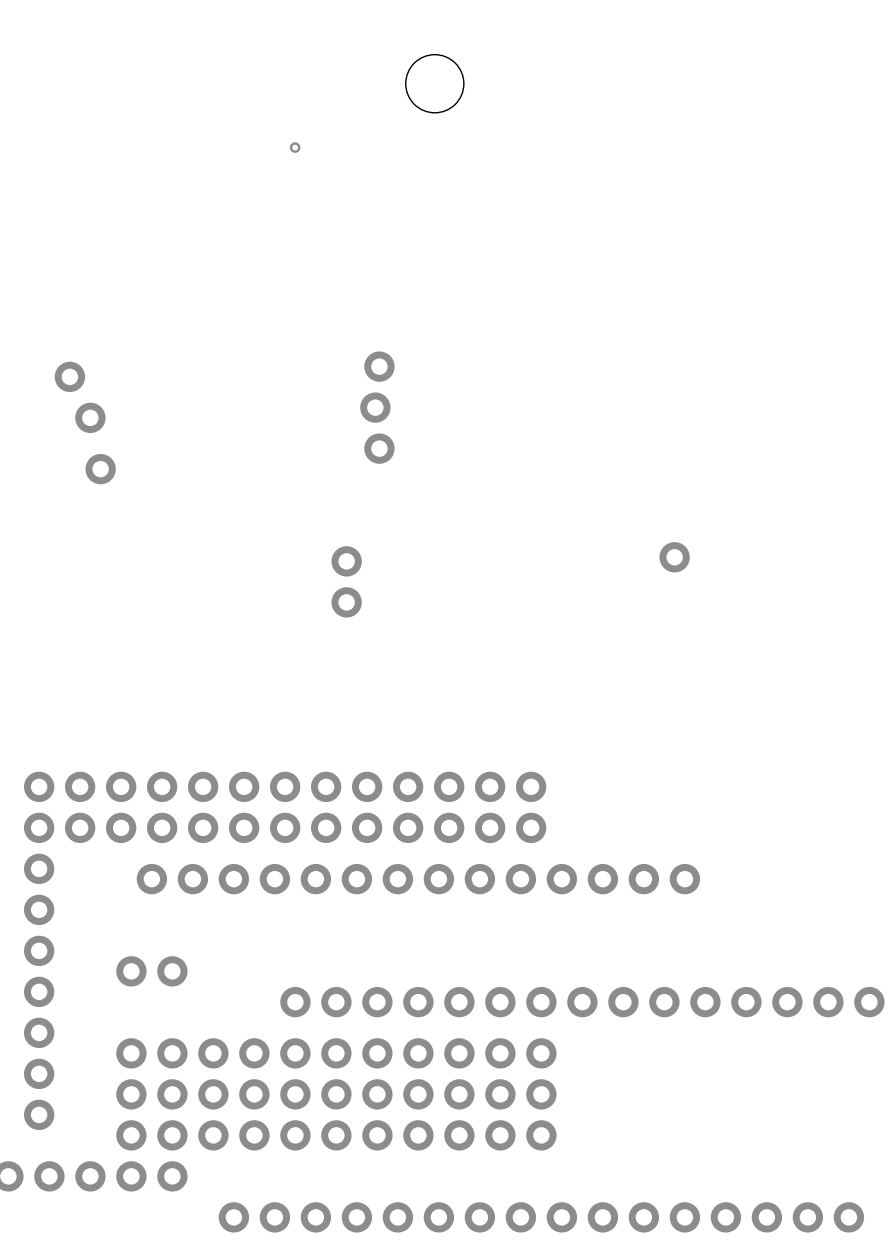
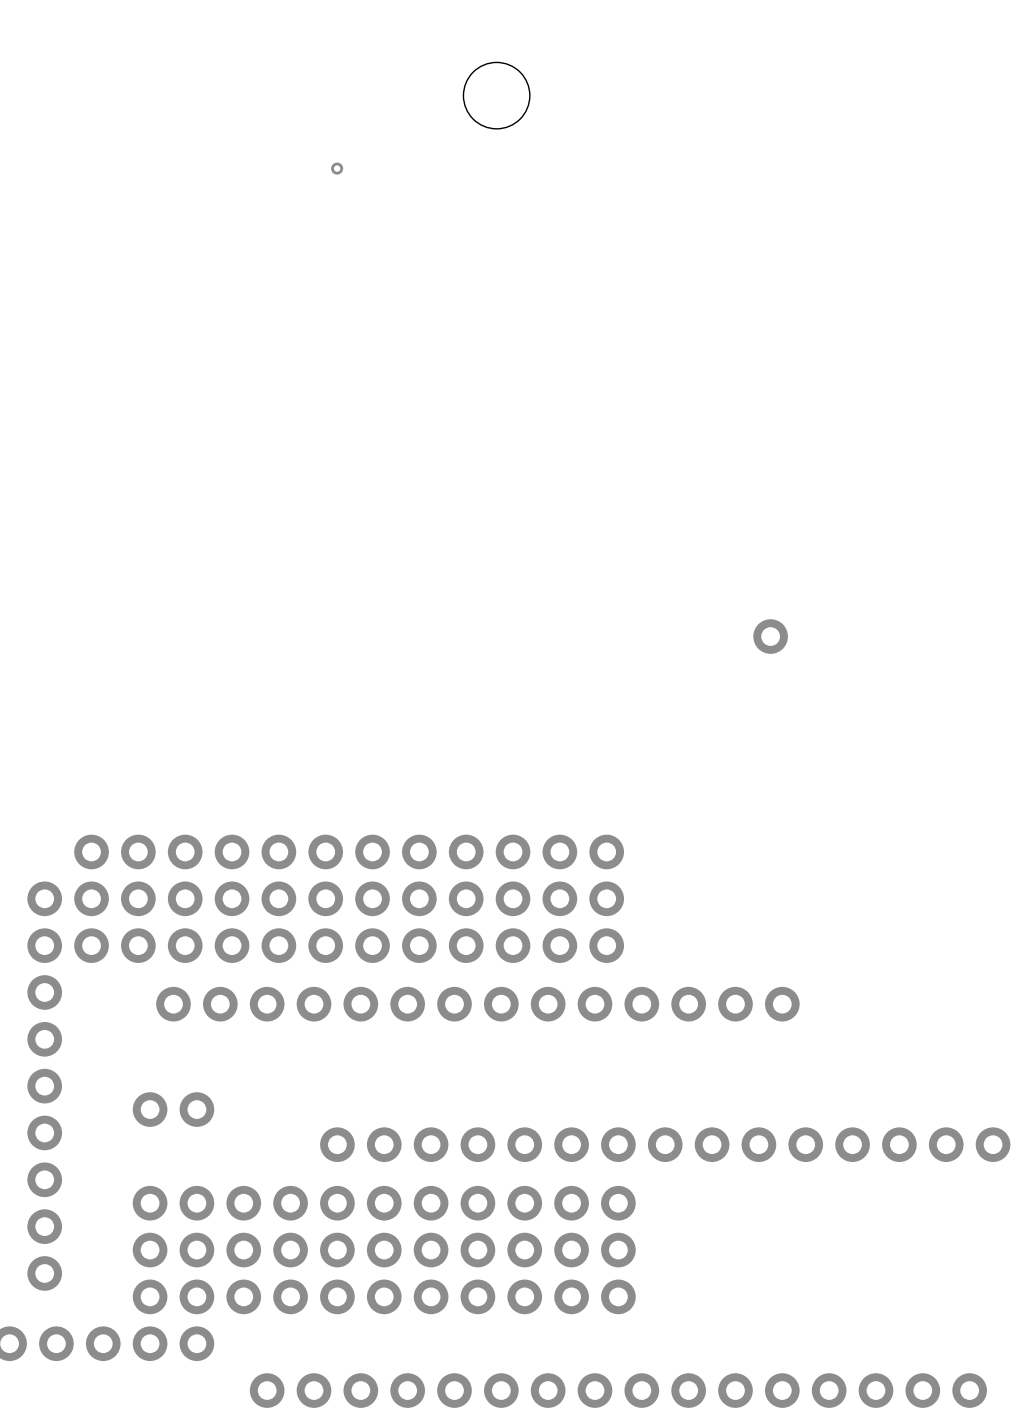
part: (69, 376) -> none
part: (377, 407) -> none
part: (90, 417) -> none
part: (100, 469) -> none
part: (346, 581) -> none
part: none -> (349, 851)

